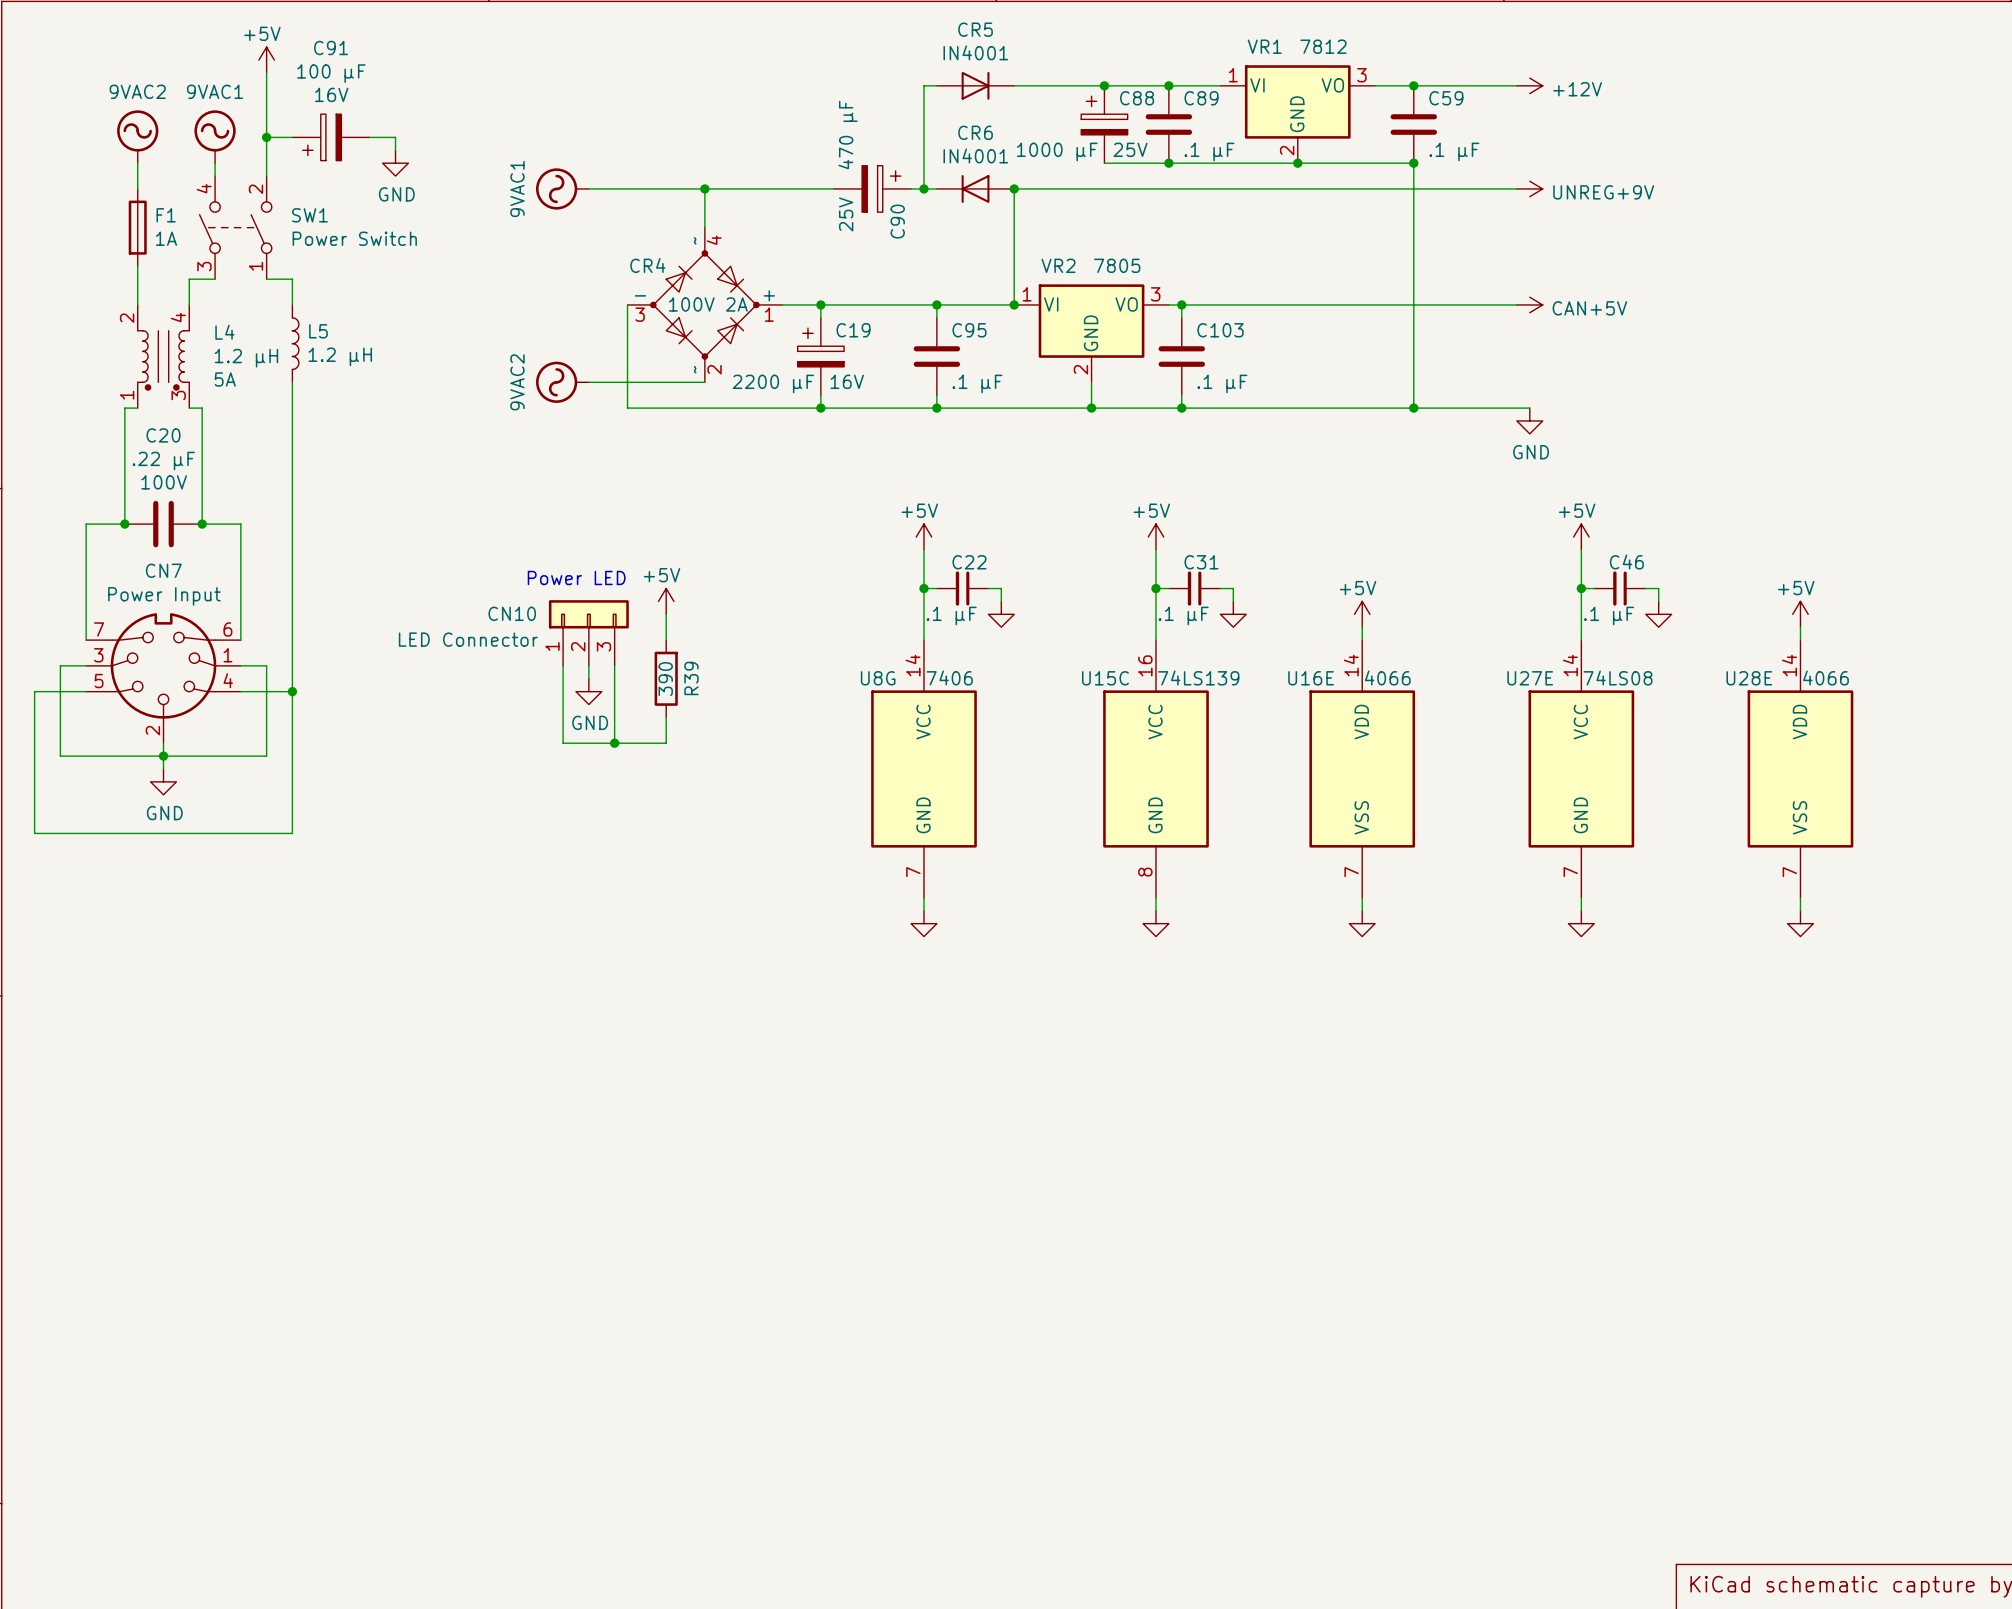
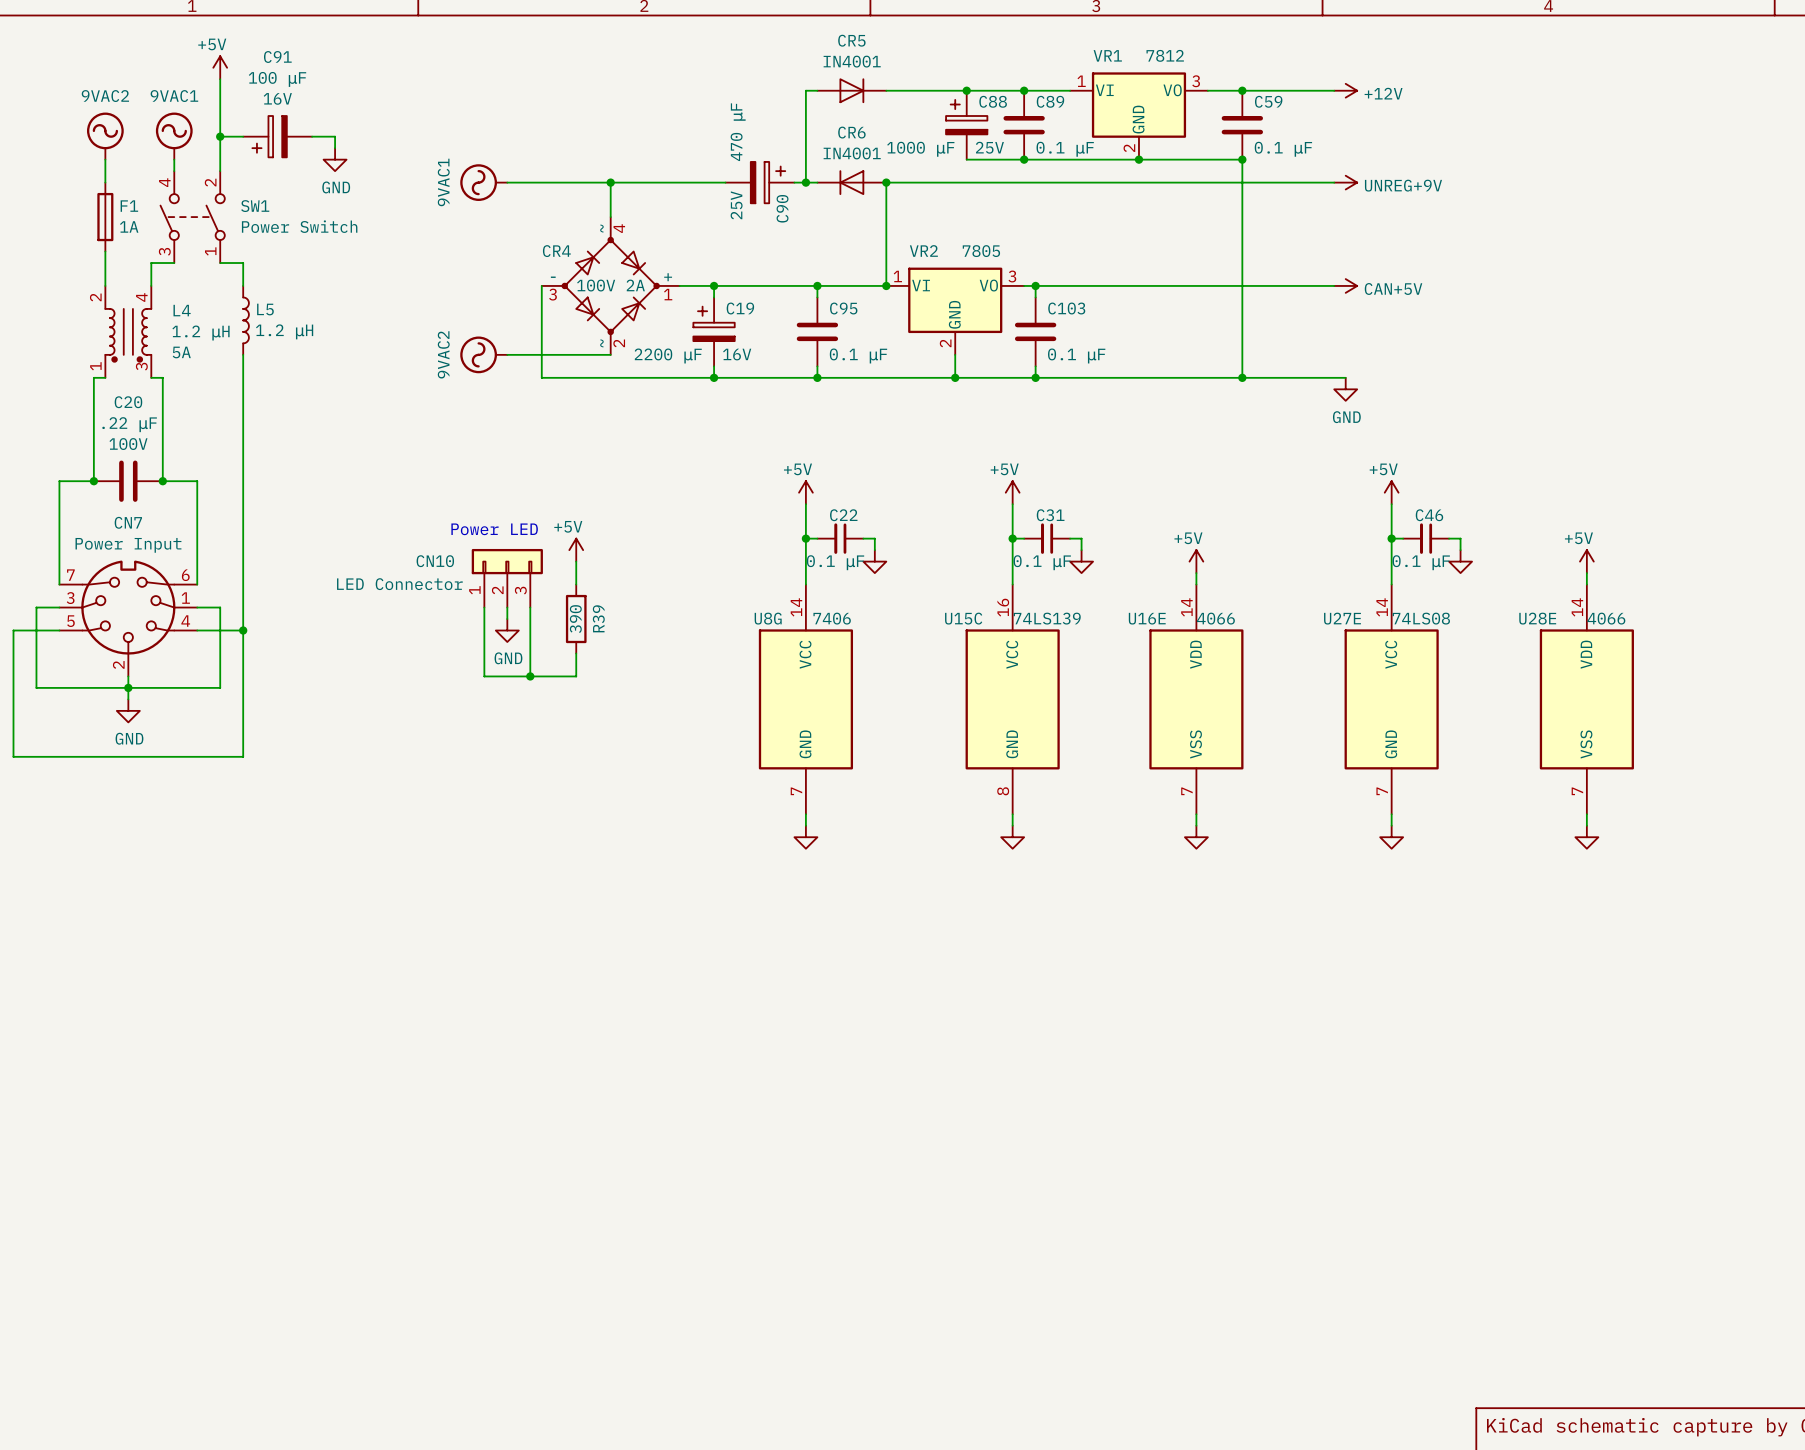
C89 value: .1 μF (1209, 151) -> 0.1 μF (1065, 149)
C59 value: .1 μF (1454, 151) -> 0.1 μF (1283, 149)
C95 value: .1 μF (977, 383) -> 0.1 μF (858, 355)
C103 value: .1 μF (1222, 383) -> 0.1 μF (1076, 355)
C22 value: .1 μF (951, 615) -> 0.1 μF (835, 562)
C31 value: .1 μF (1183, 615) -> 0.1 μF (1042, 562)
C46 value: .1 μF (1609, 615) -> 0.1 μF (1421, 562)

